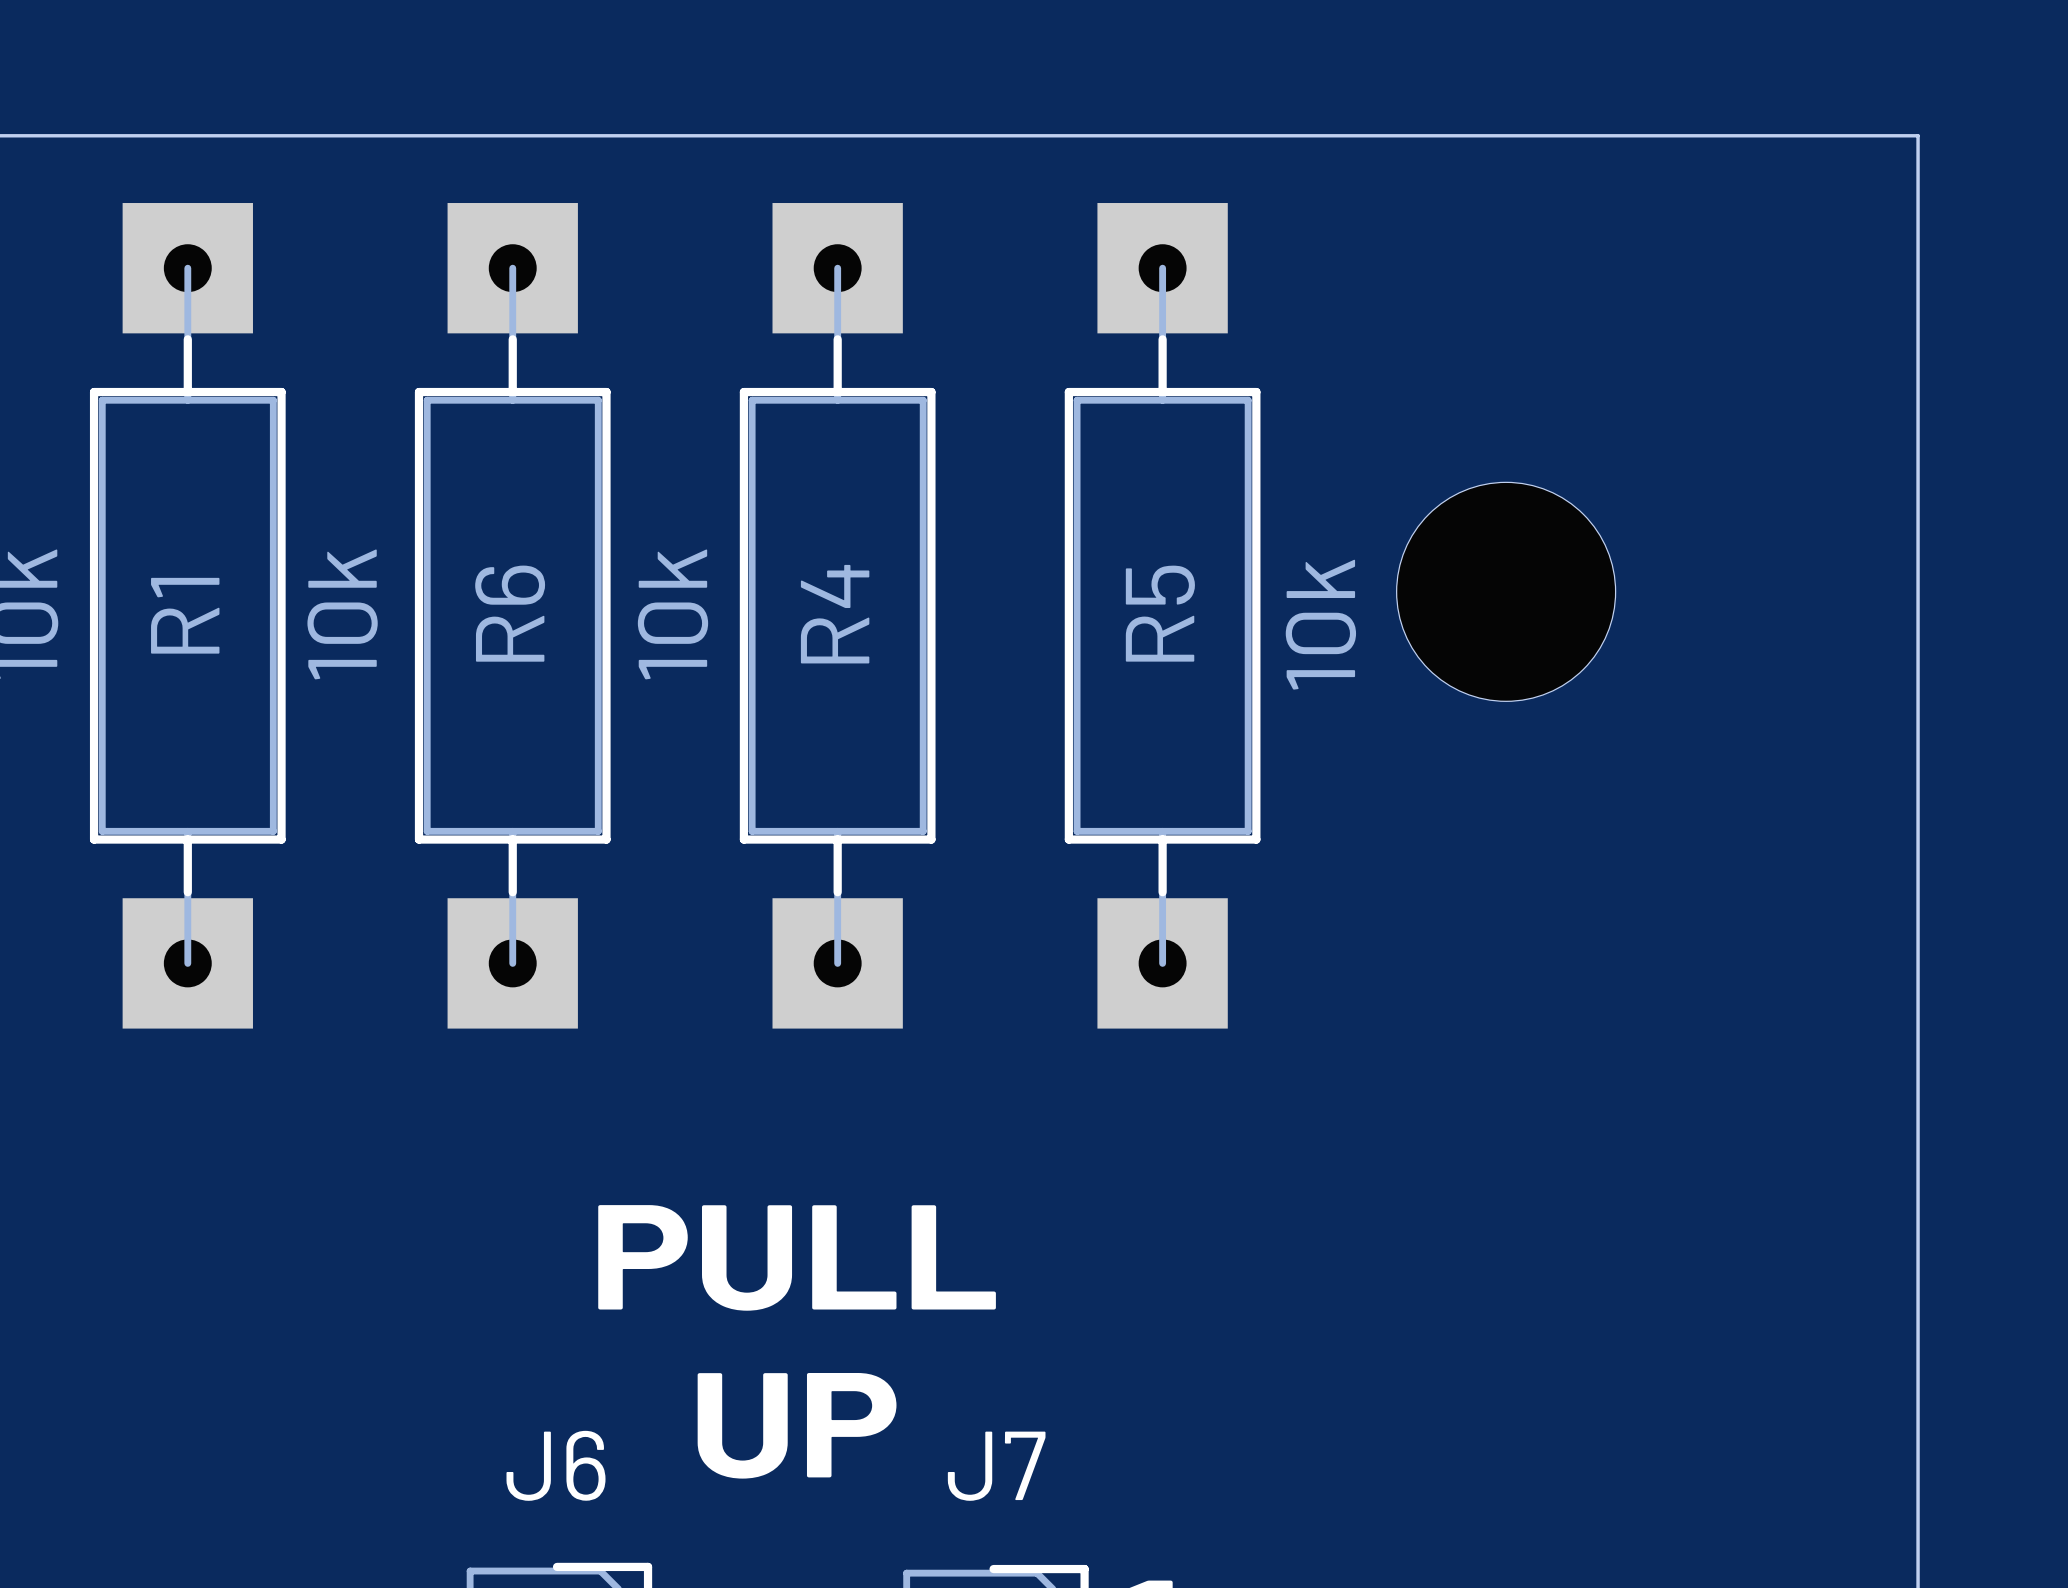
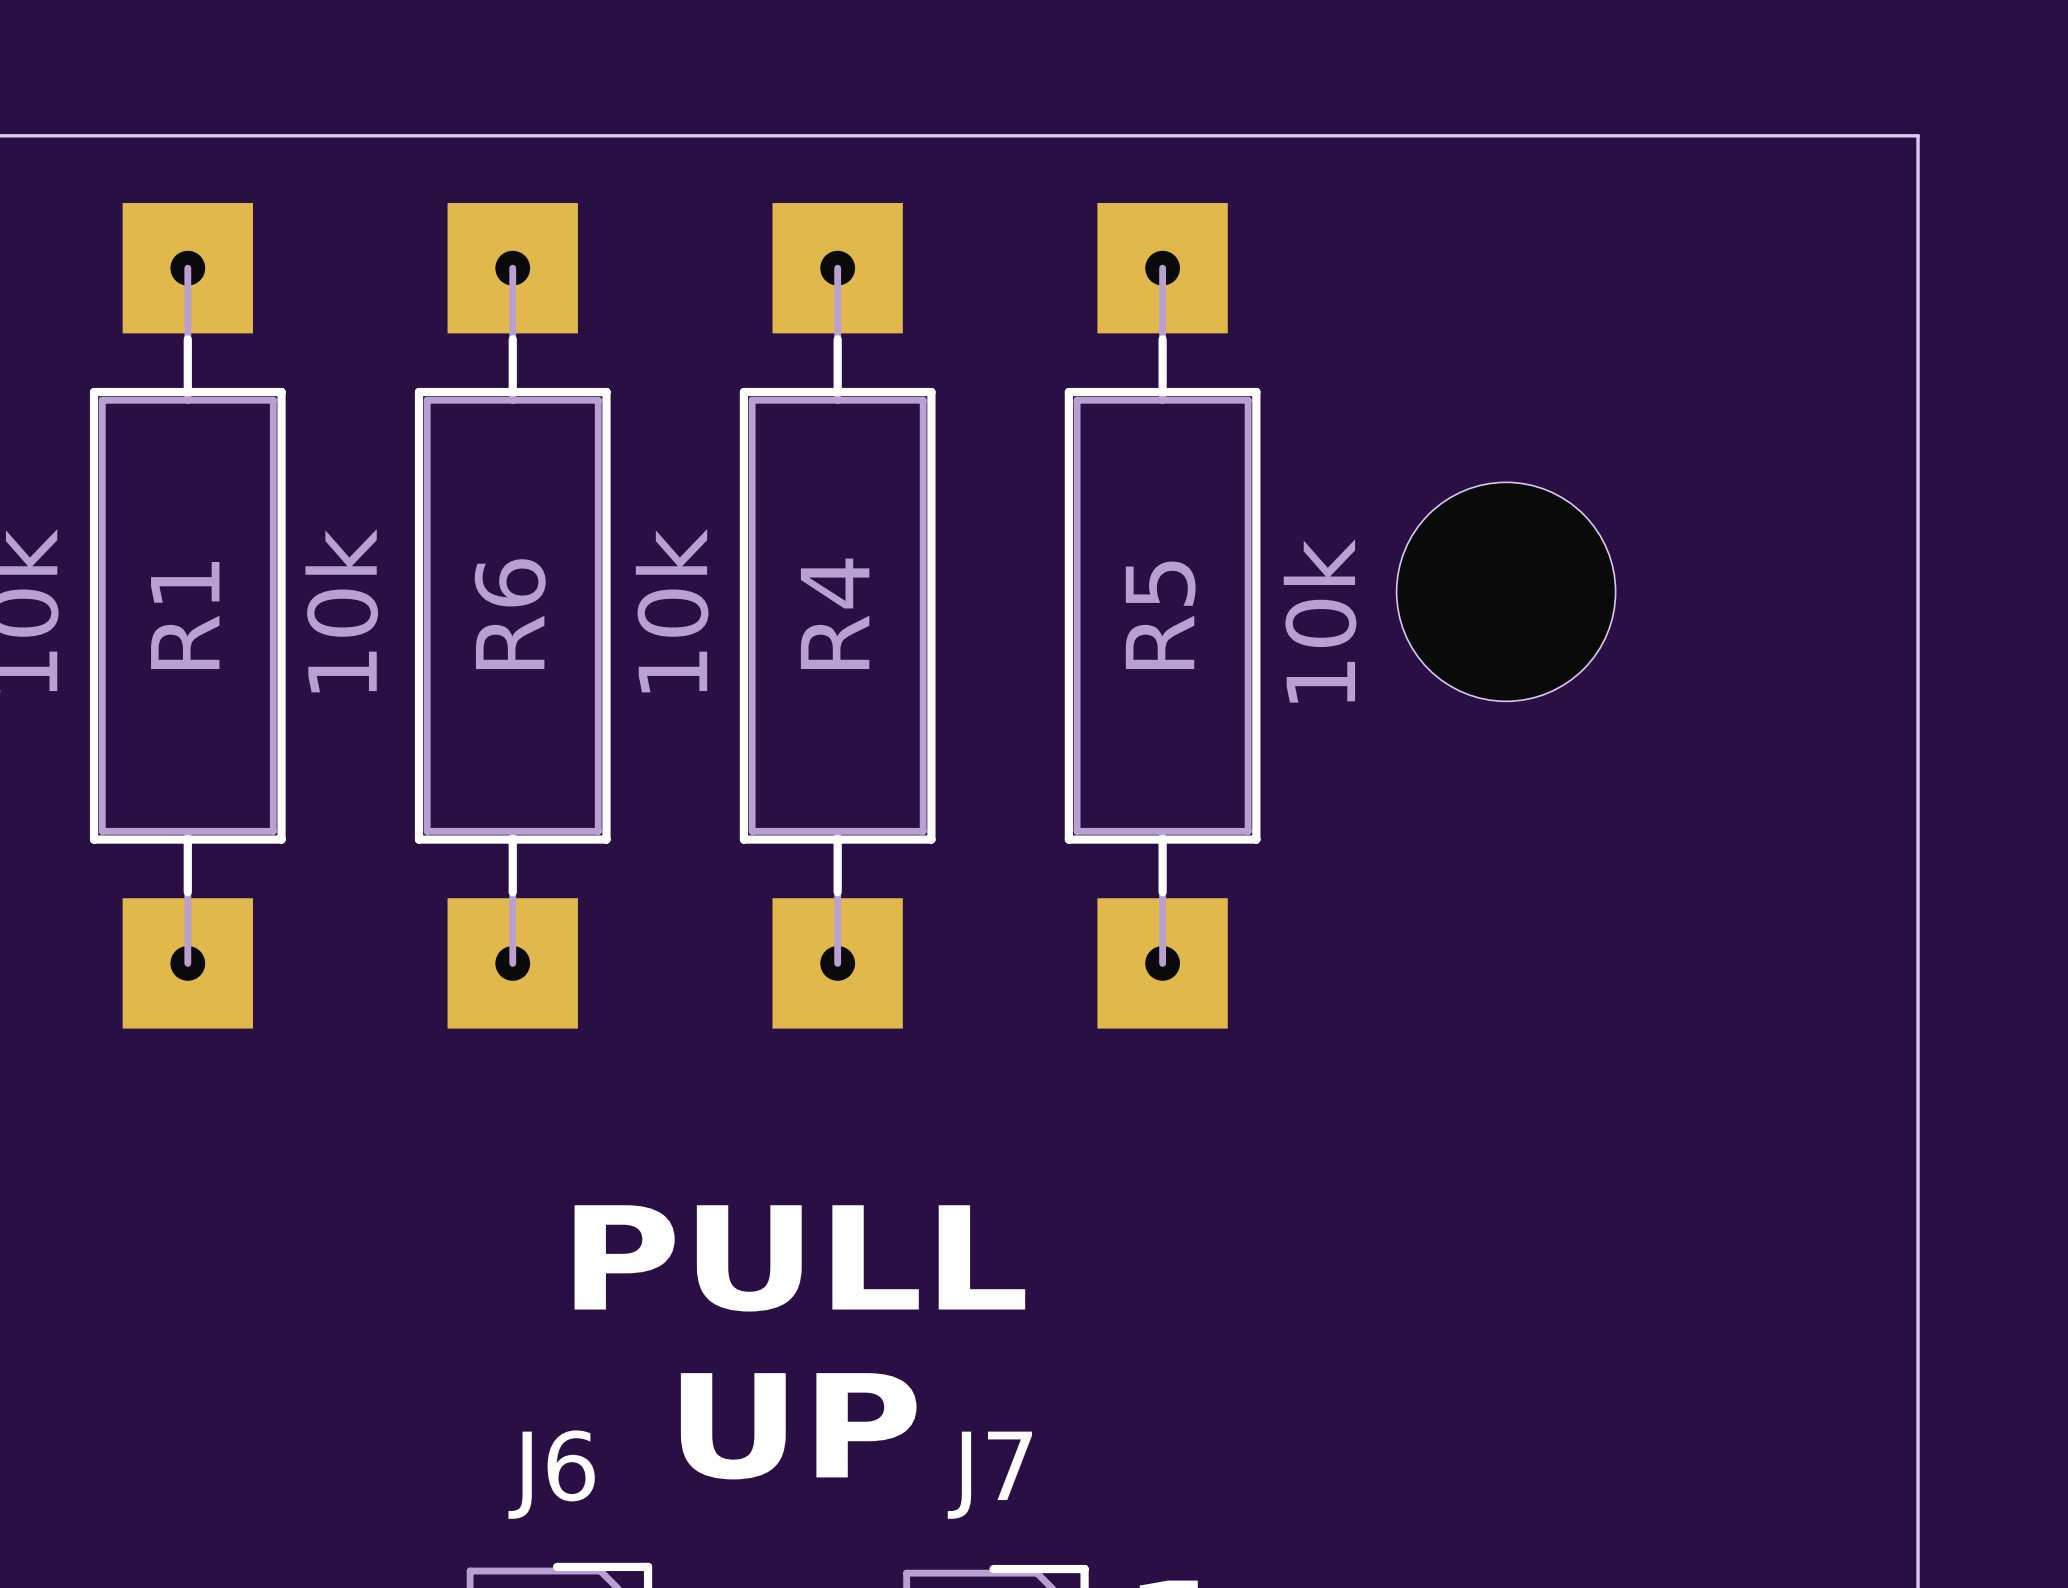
R1 footprint: [89, 203, 286, 1029] -> [89, 203, 286, 1029]
R6 footprint: [414, 203, 611, 1029] -> [414, 203, 611, 1029]
R4 footprint: [739, 203, 936, 1029] -> [739, 203, 936, 1029]
R5 footprint: [1064, 203, 1261, 1029] -> [1064, 203, 1261, 1029]

